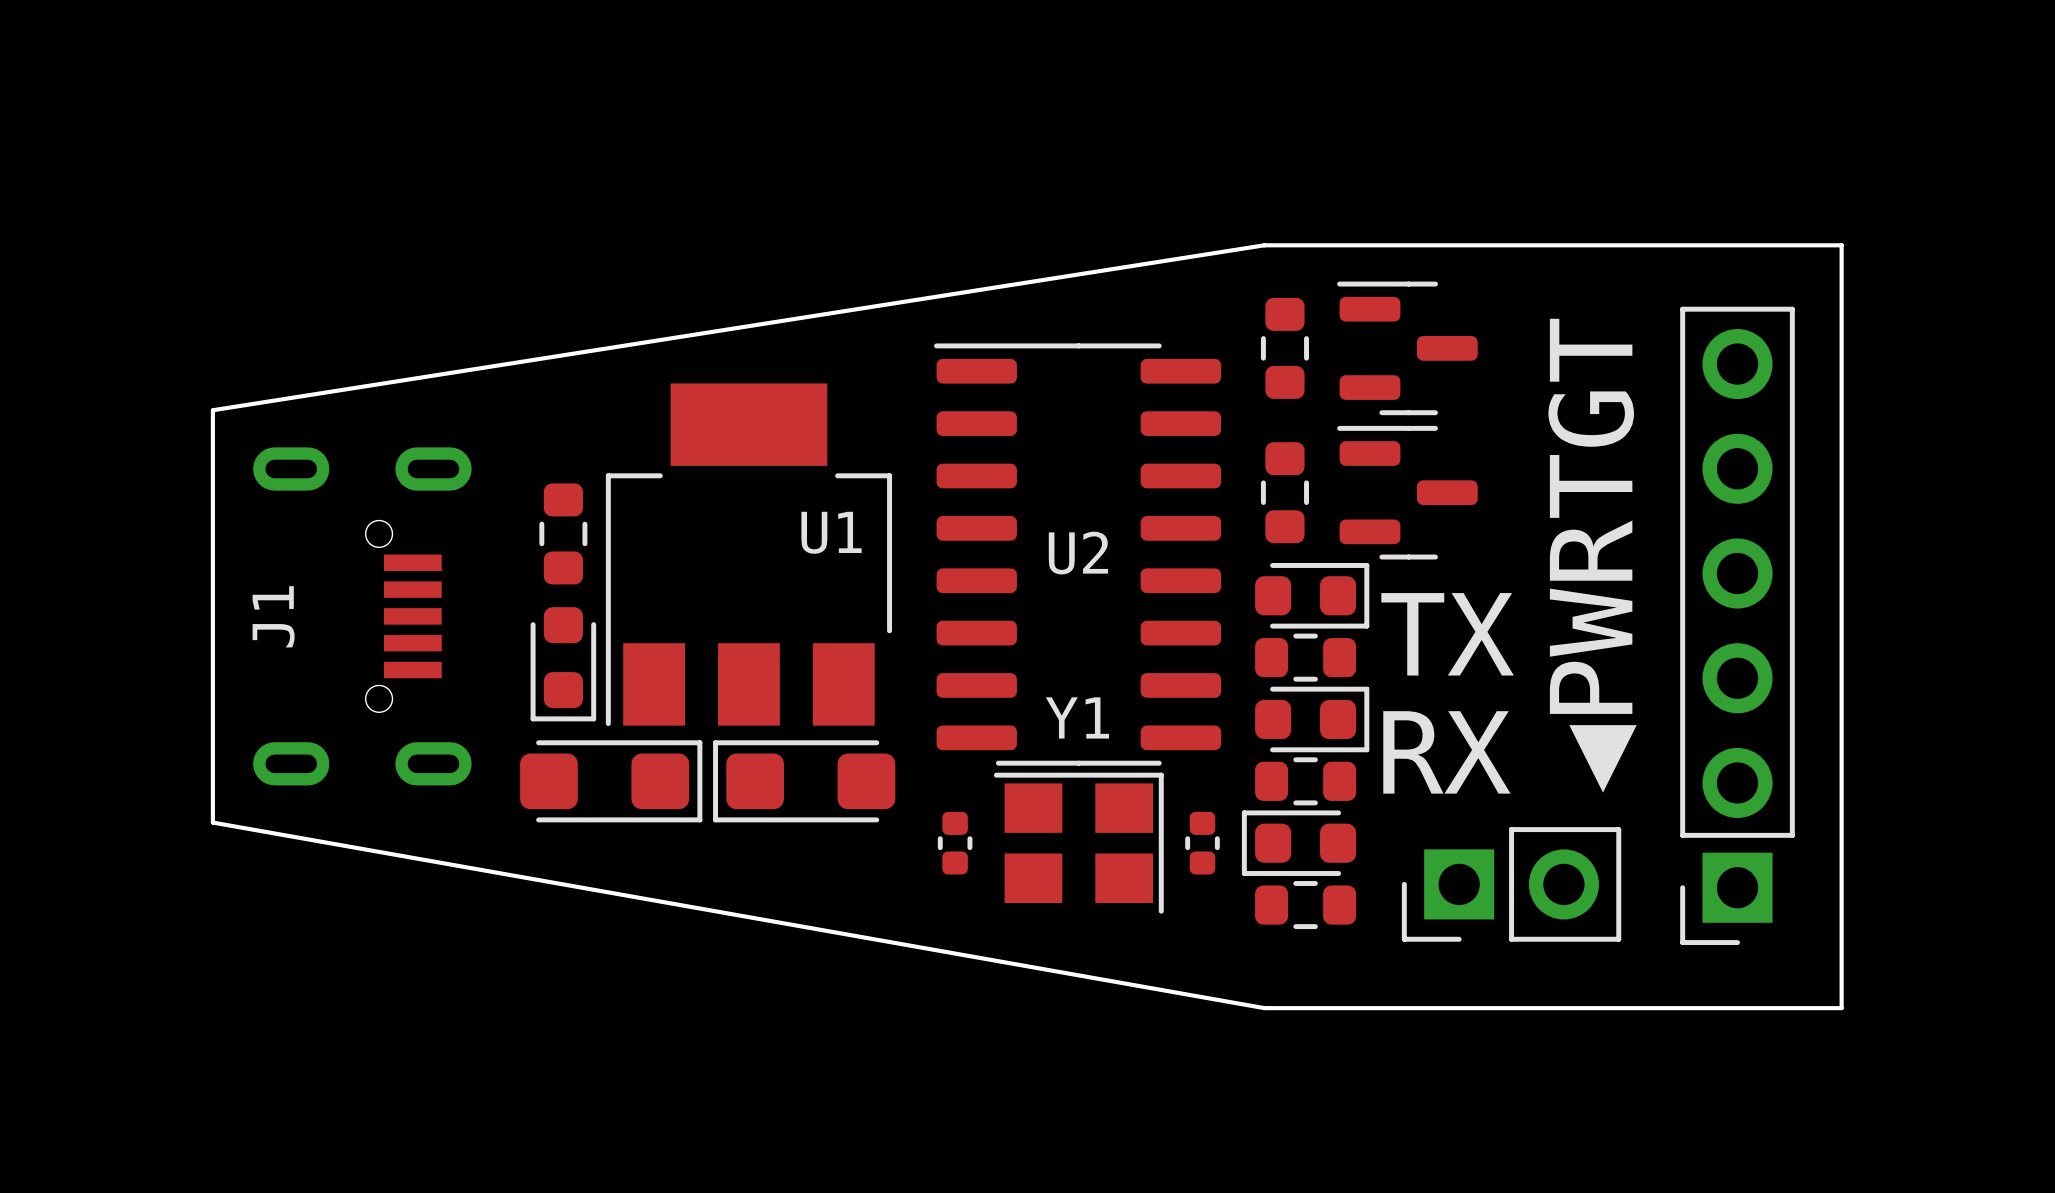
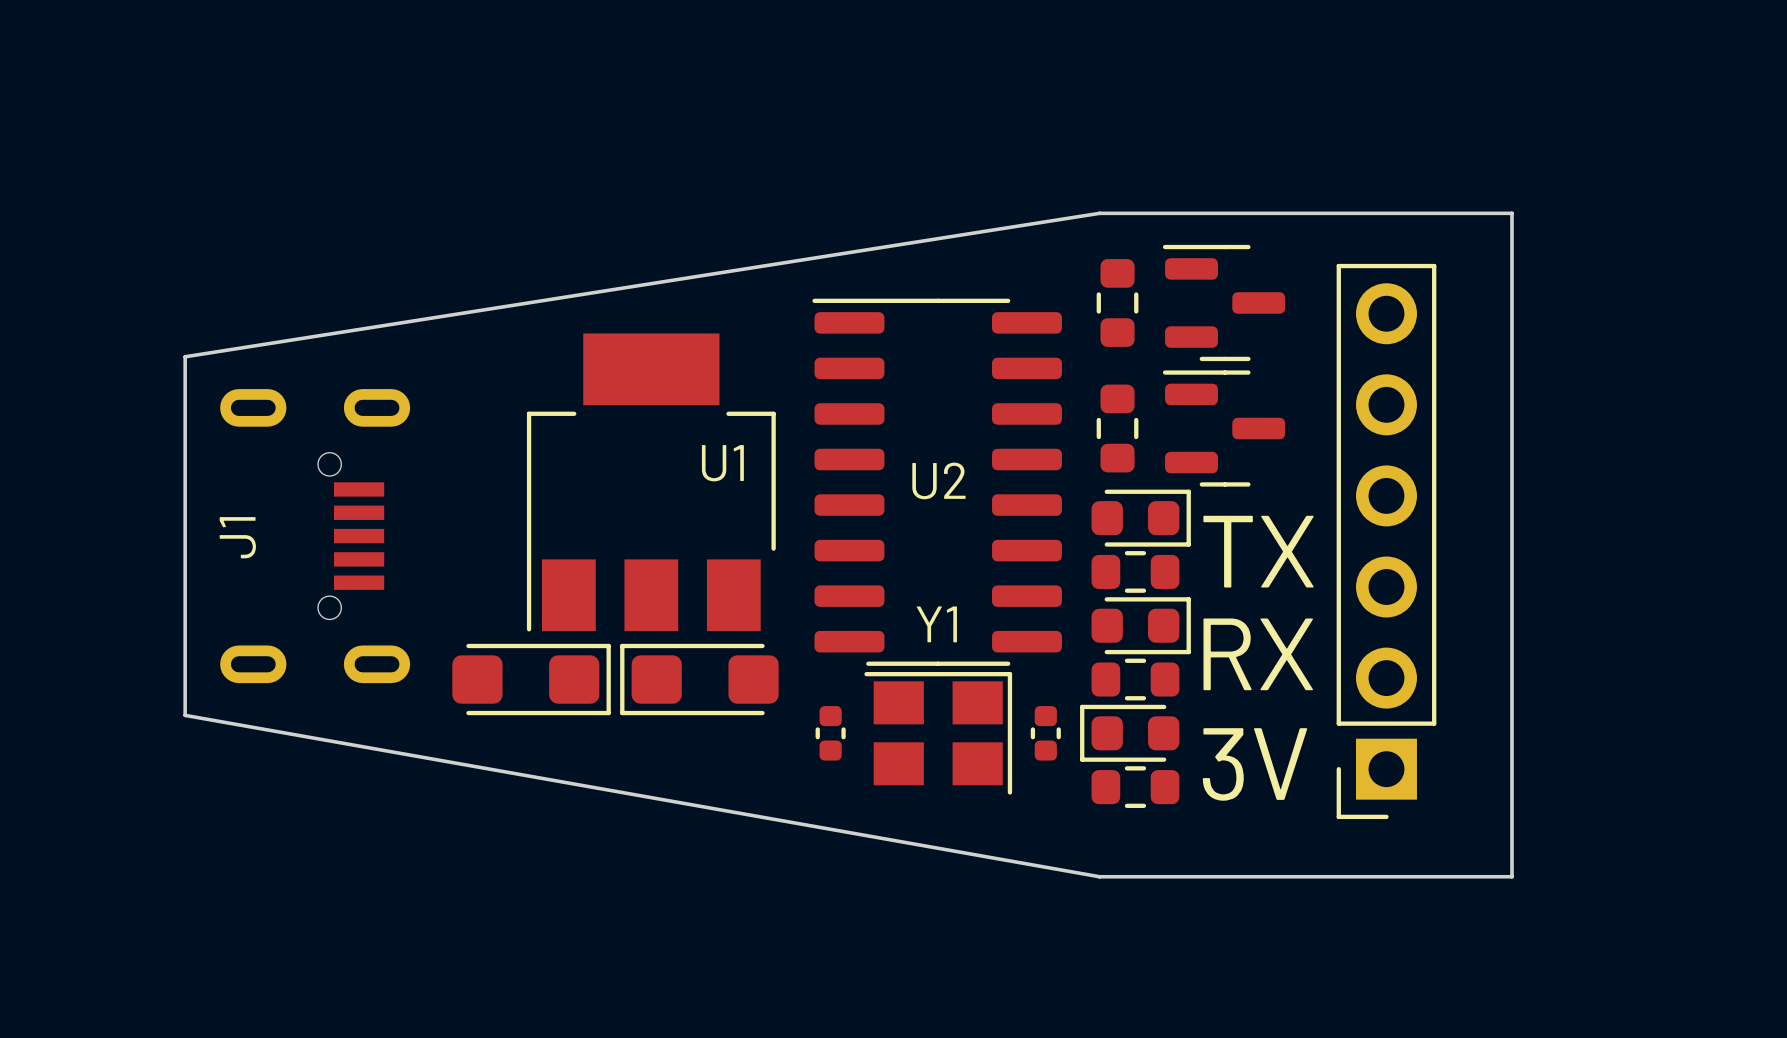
board edge: (1738, 245) (1841, 245) (1841, 1008) (1738, 1008) -> (1512, 213) (1512, 876)
part: (563, 533) -> none
text: ◀PWRTGT (1592, 555) -> none
part position: (1737, 625) -> (1386, 541)
part: (563, 664) -> none
text: none -> 3V (1255, 764)
part: (1511, 884) -> none

